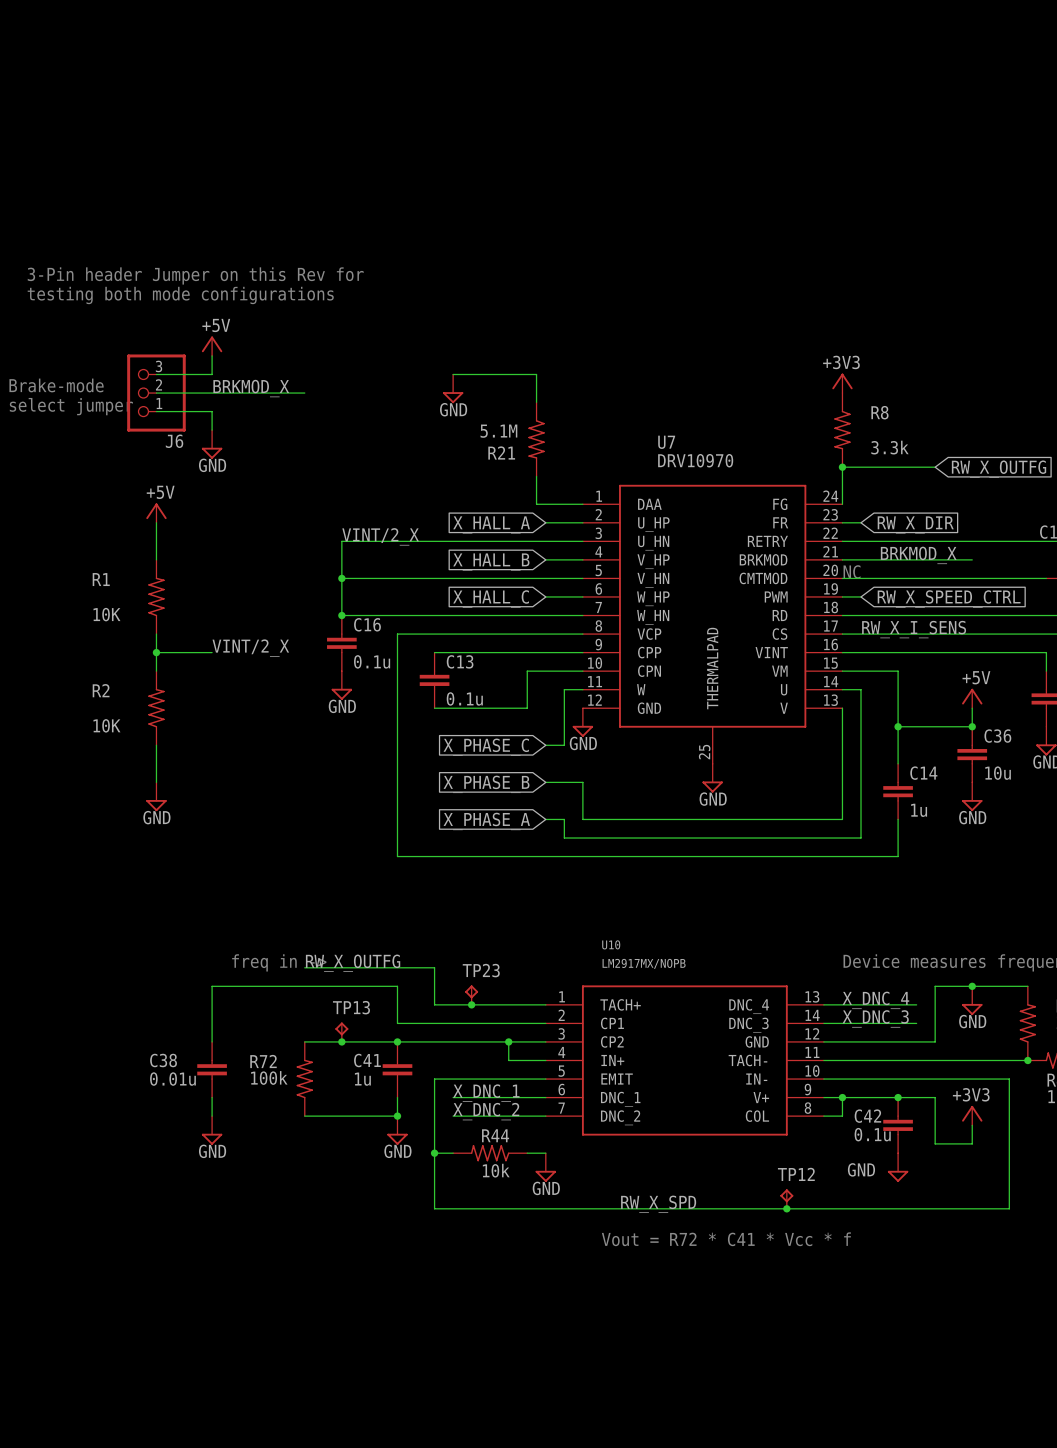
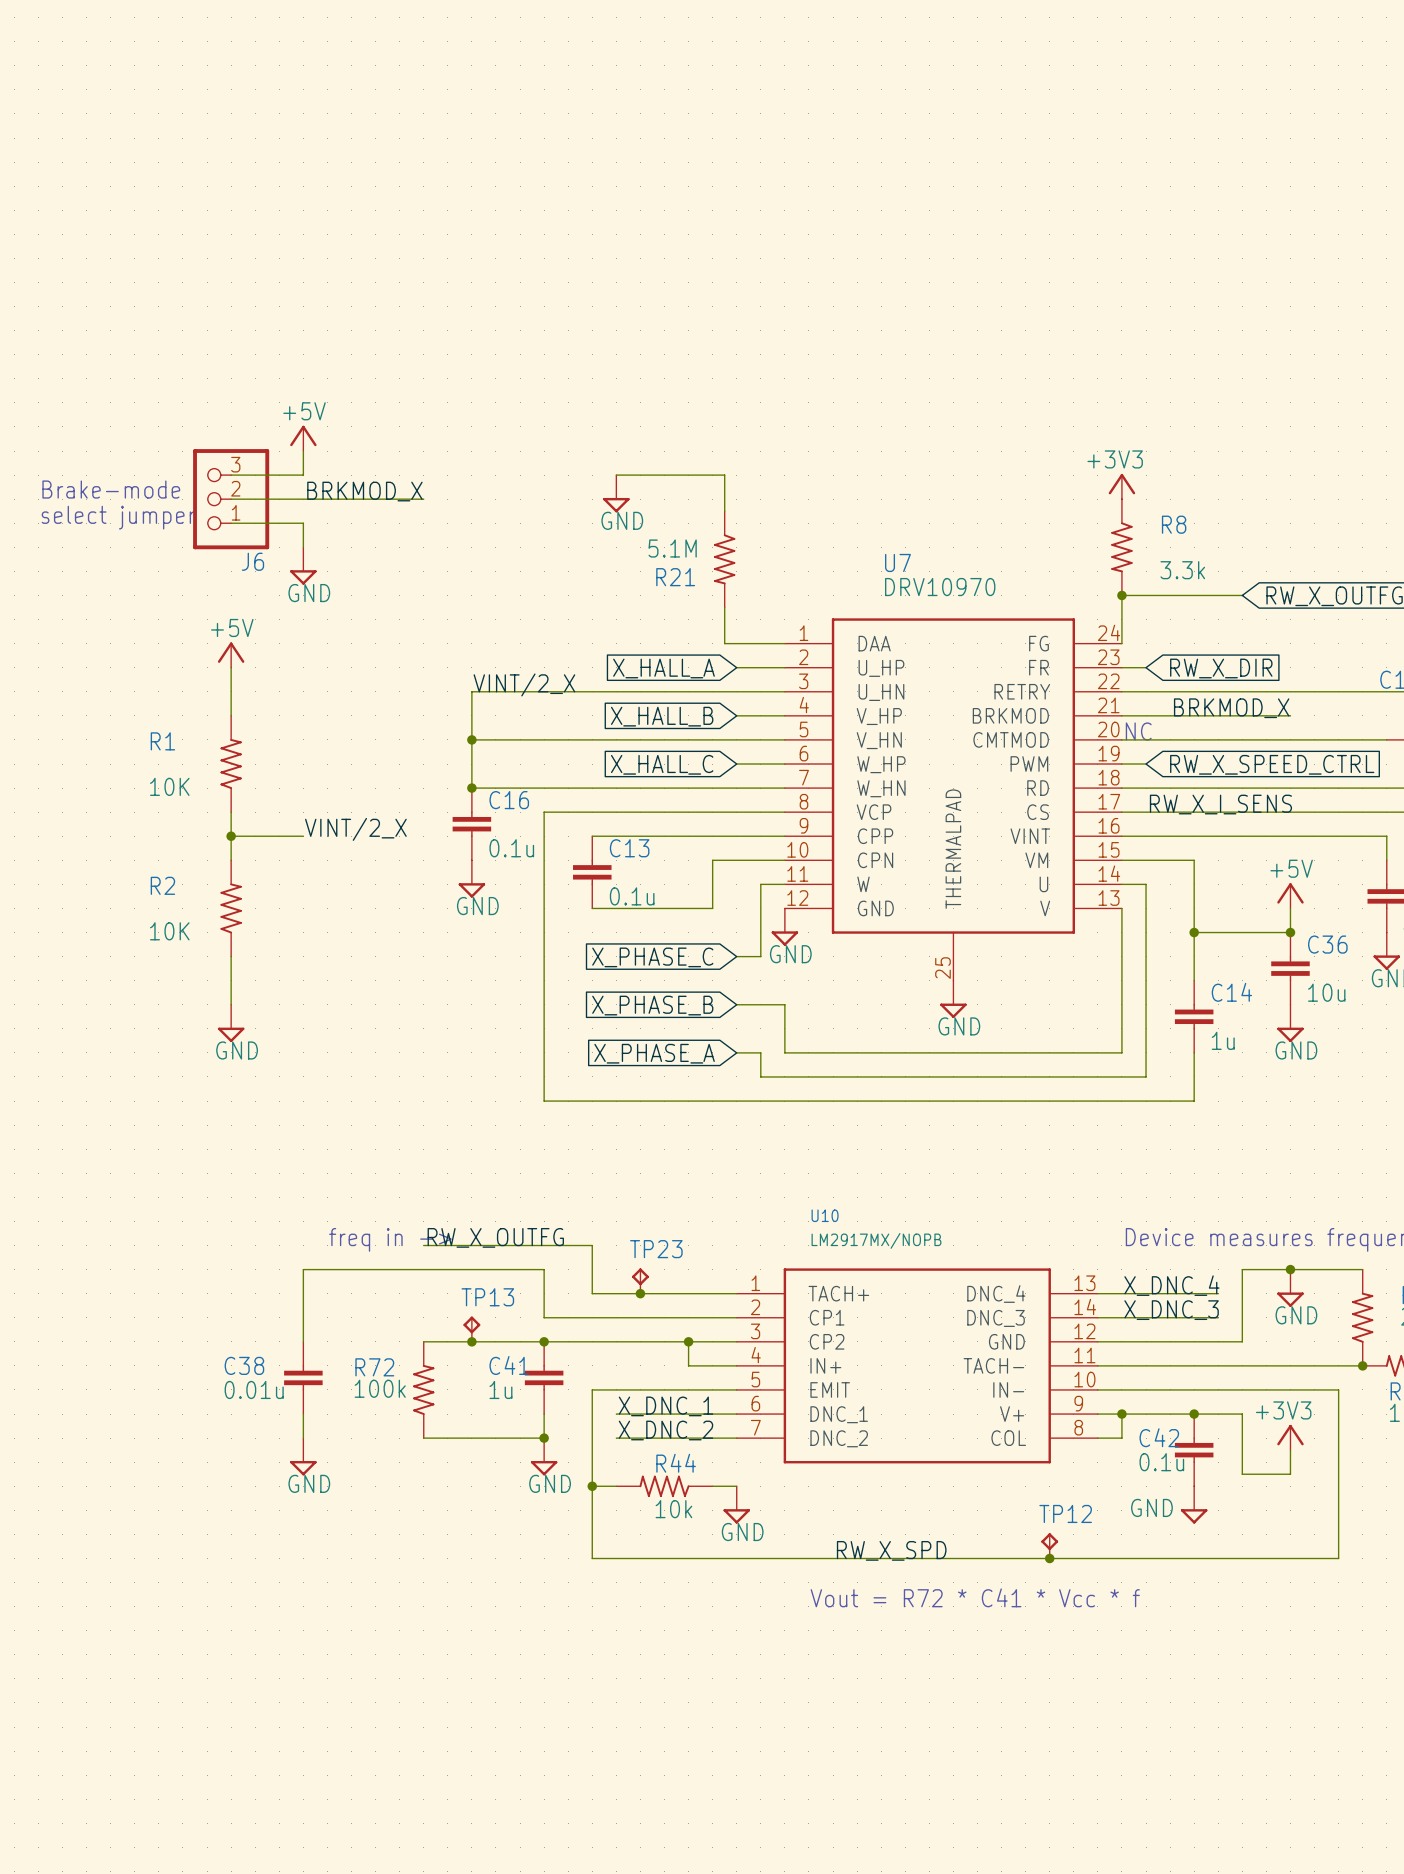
text: 3-Pin header Jumper on this Rev for (195, 275) -> none
text: testing both mode configurations (180, 295) -> none

